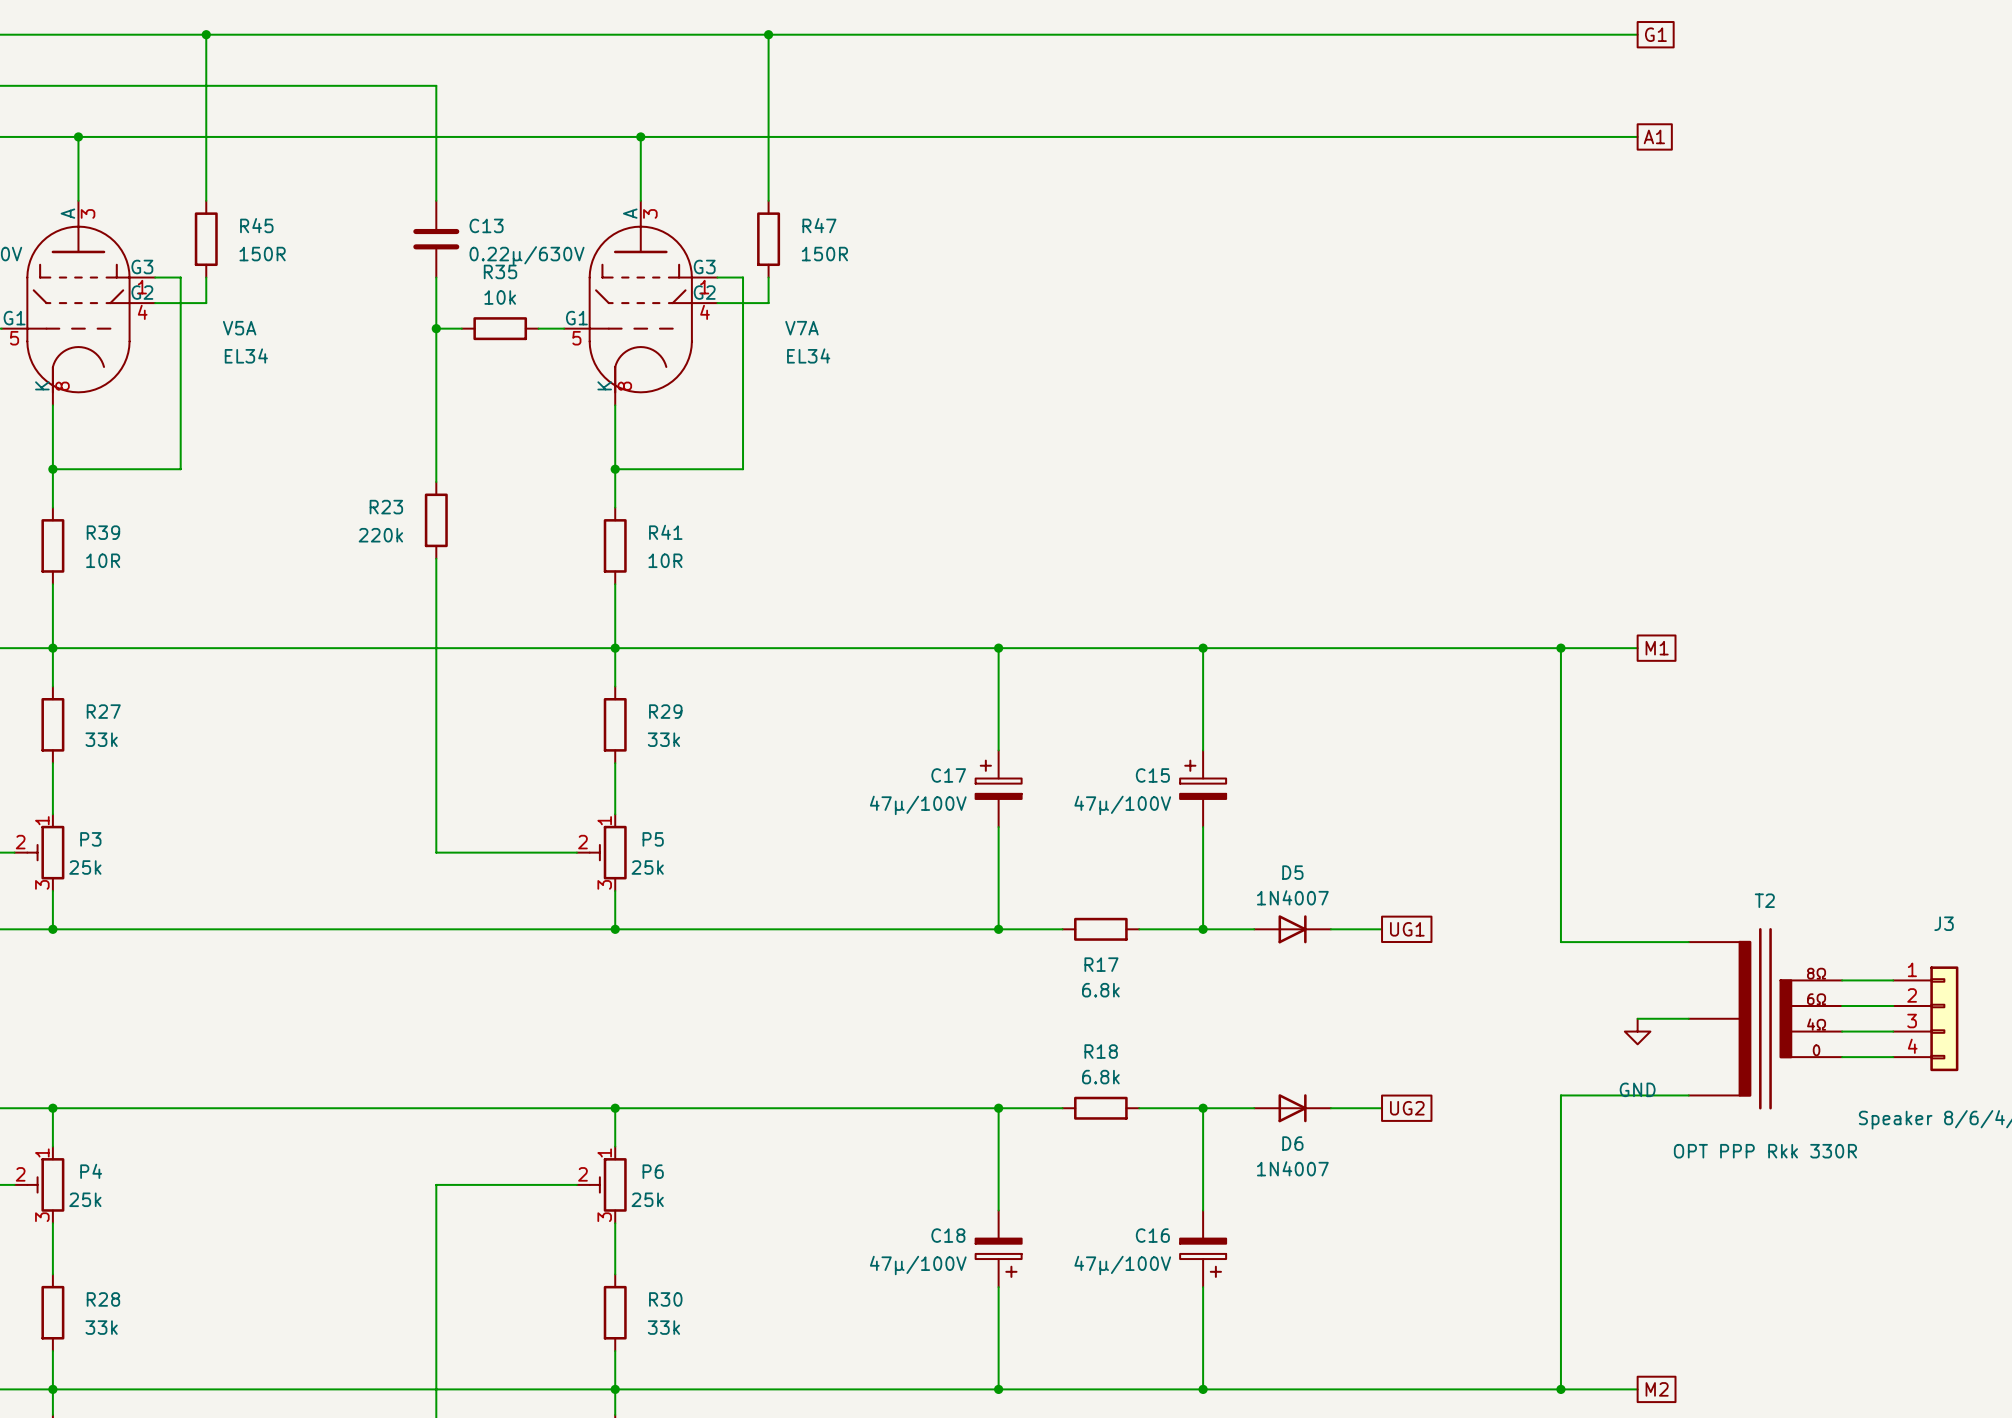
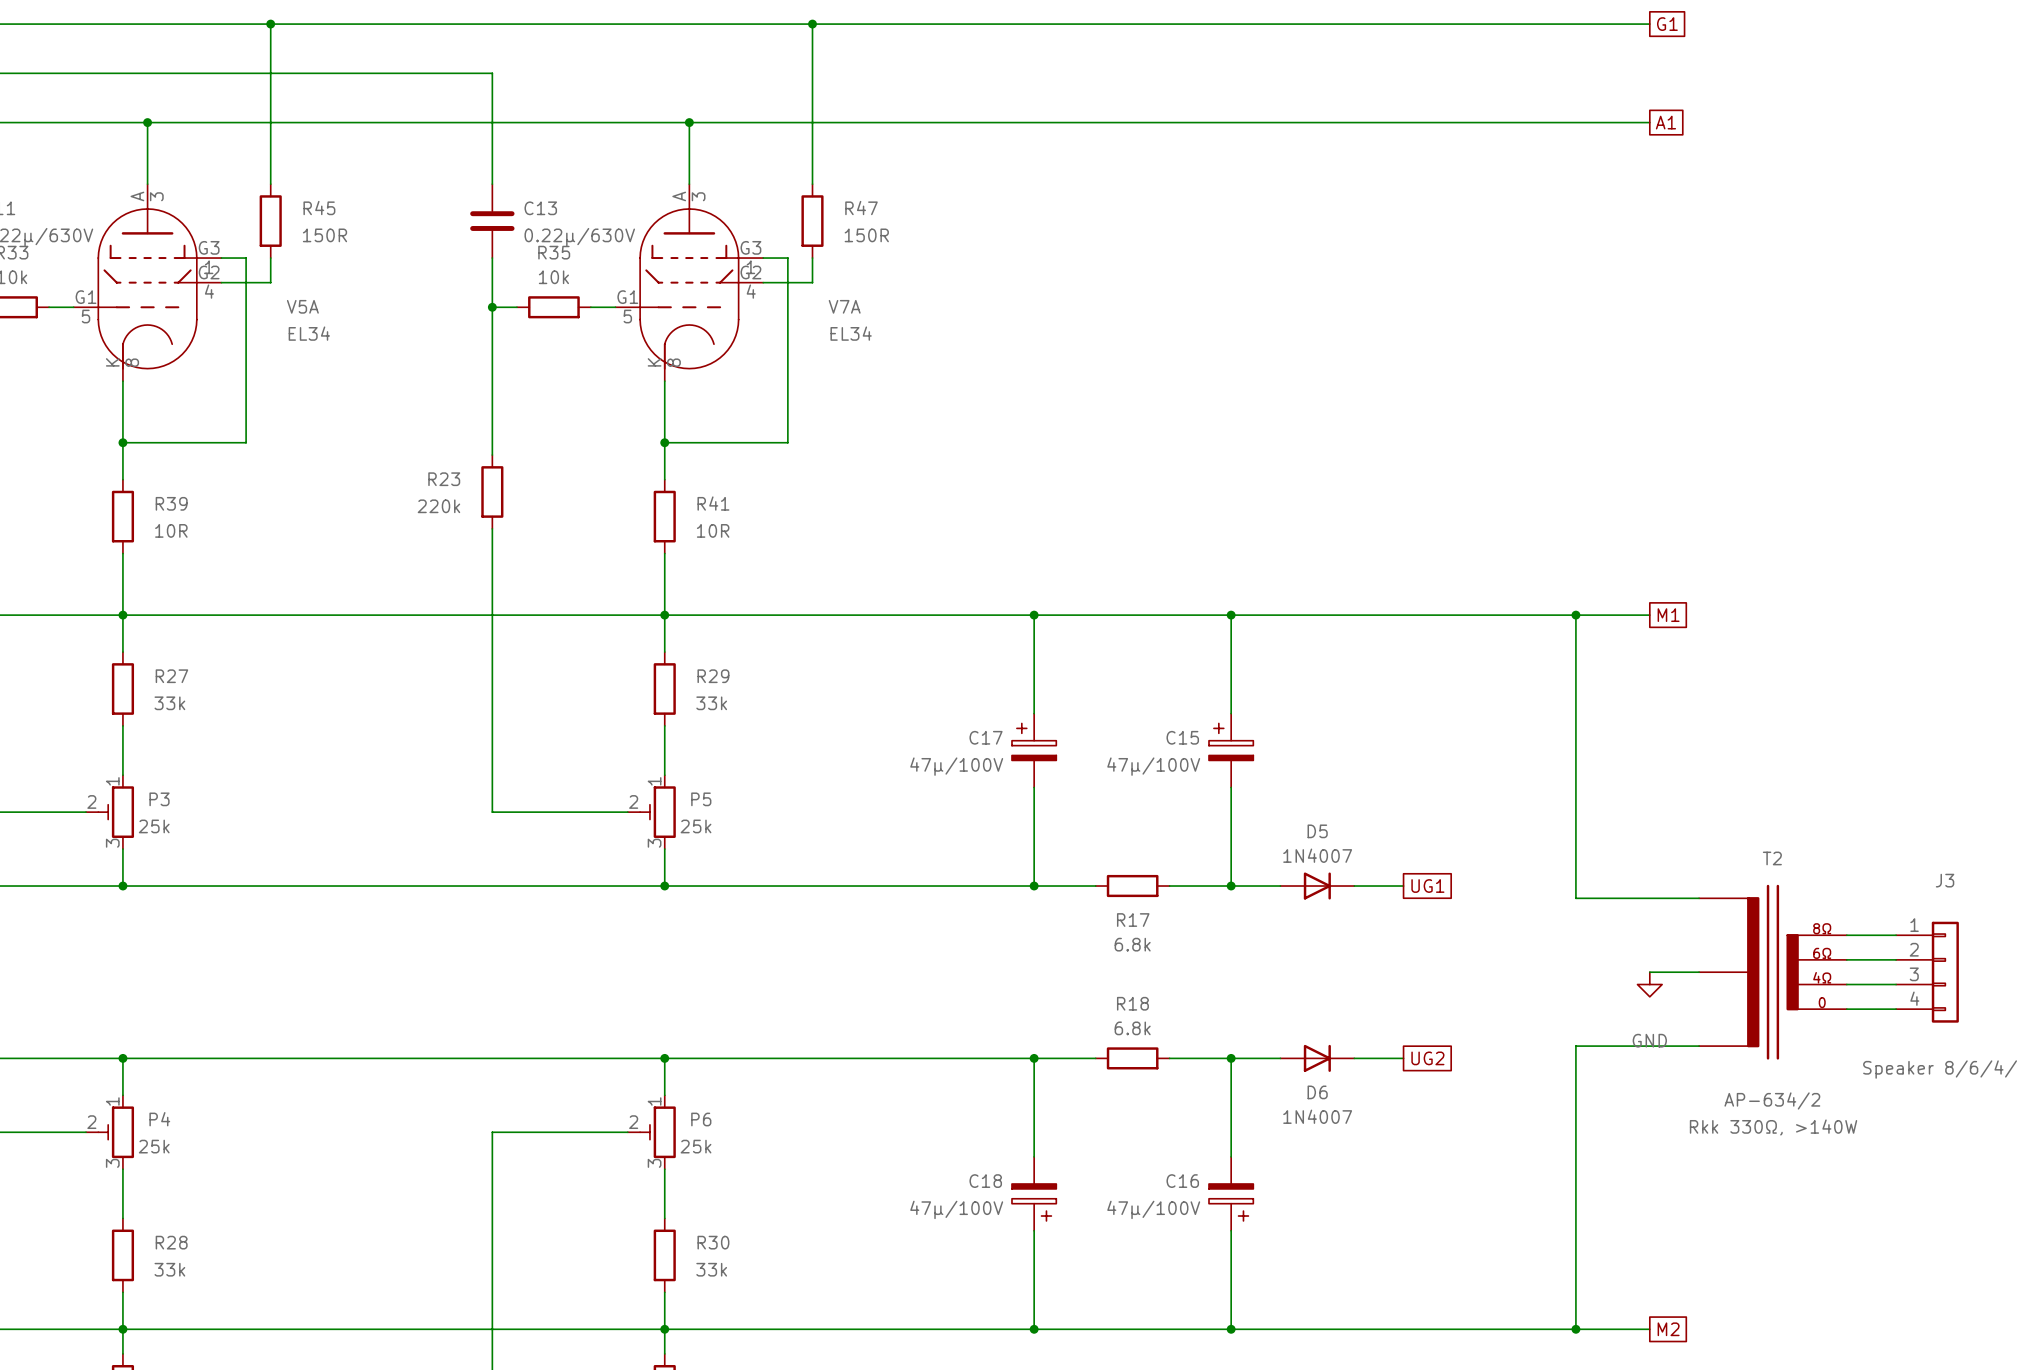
T2 value: OPT PPP Rkk 330R (1765, 1151) -> AP-634/2 (1772, 1100)
T2 text: none -> Rkk 330Ω, >140W (1773, 1127)

